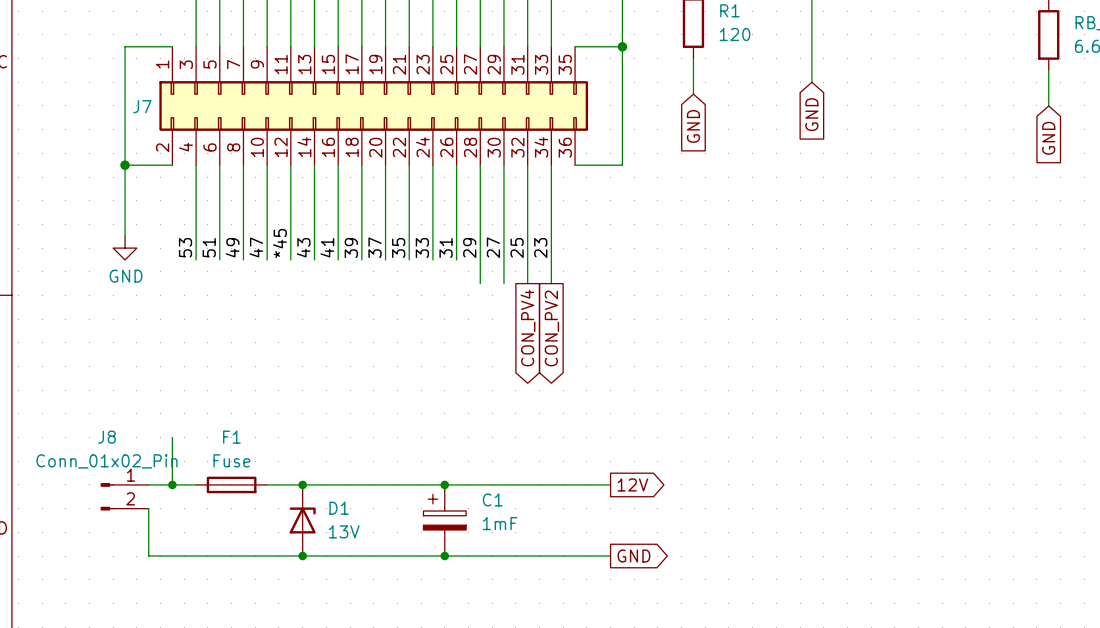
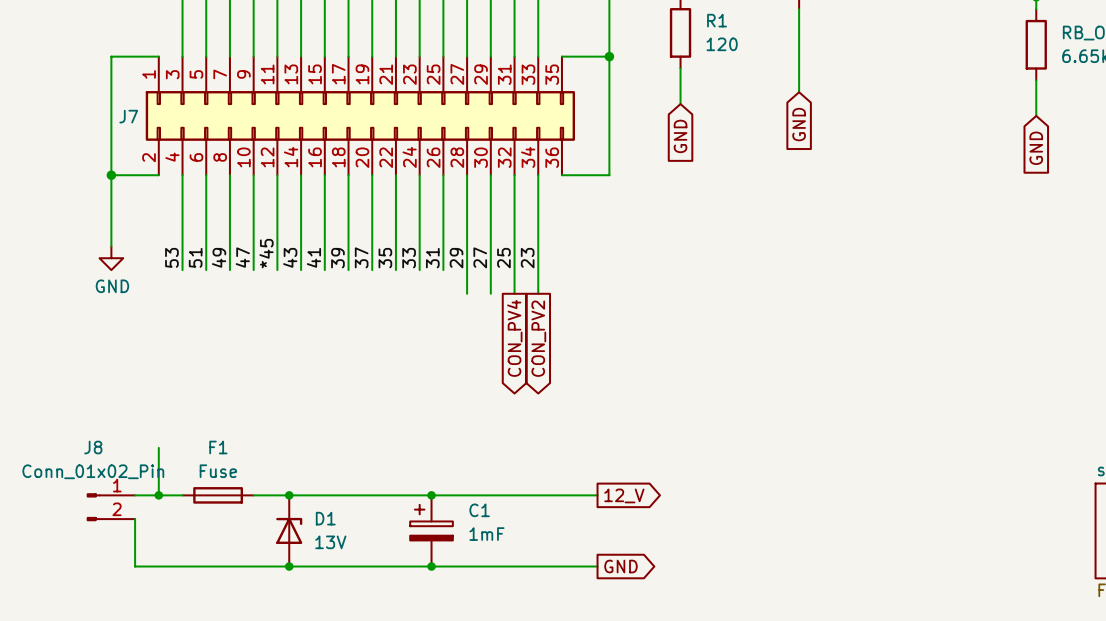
global label: 12V (632, 484) -> 12_V (624, 495)

